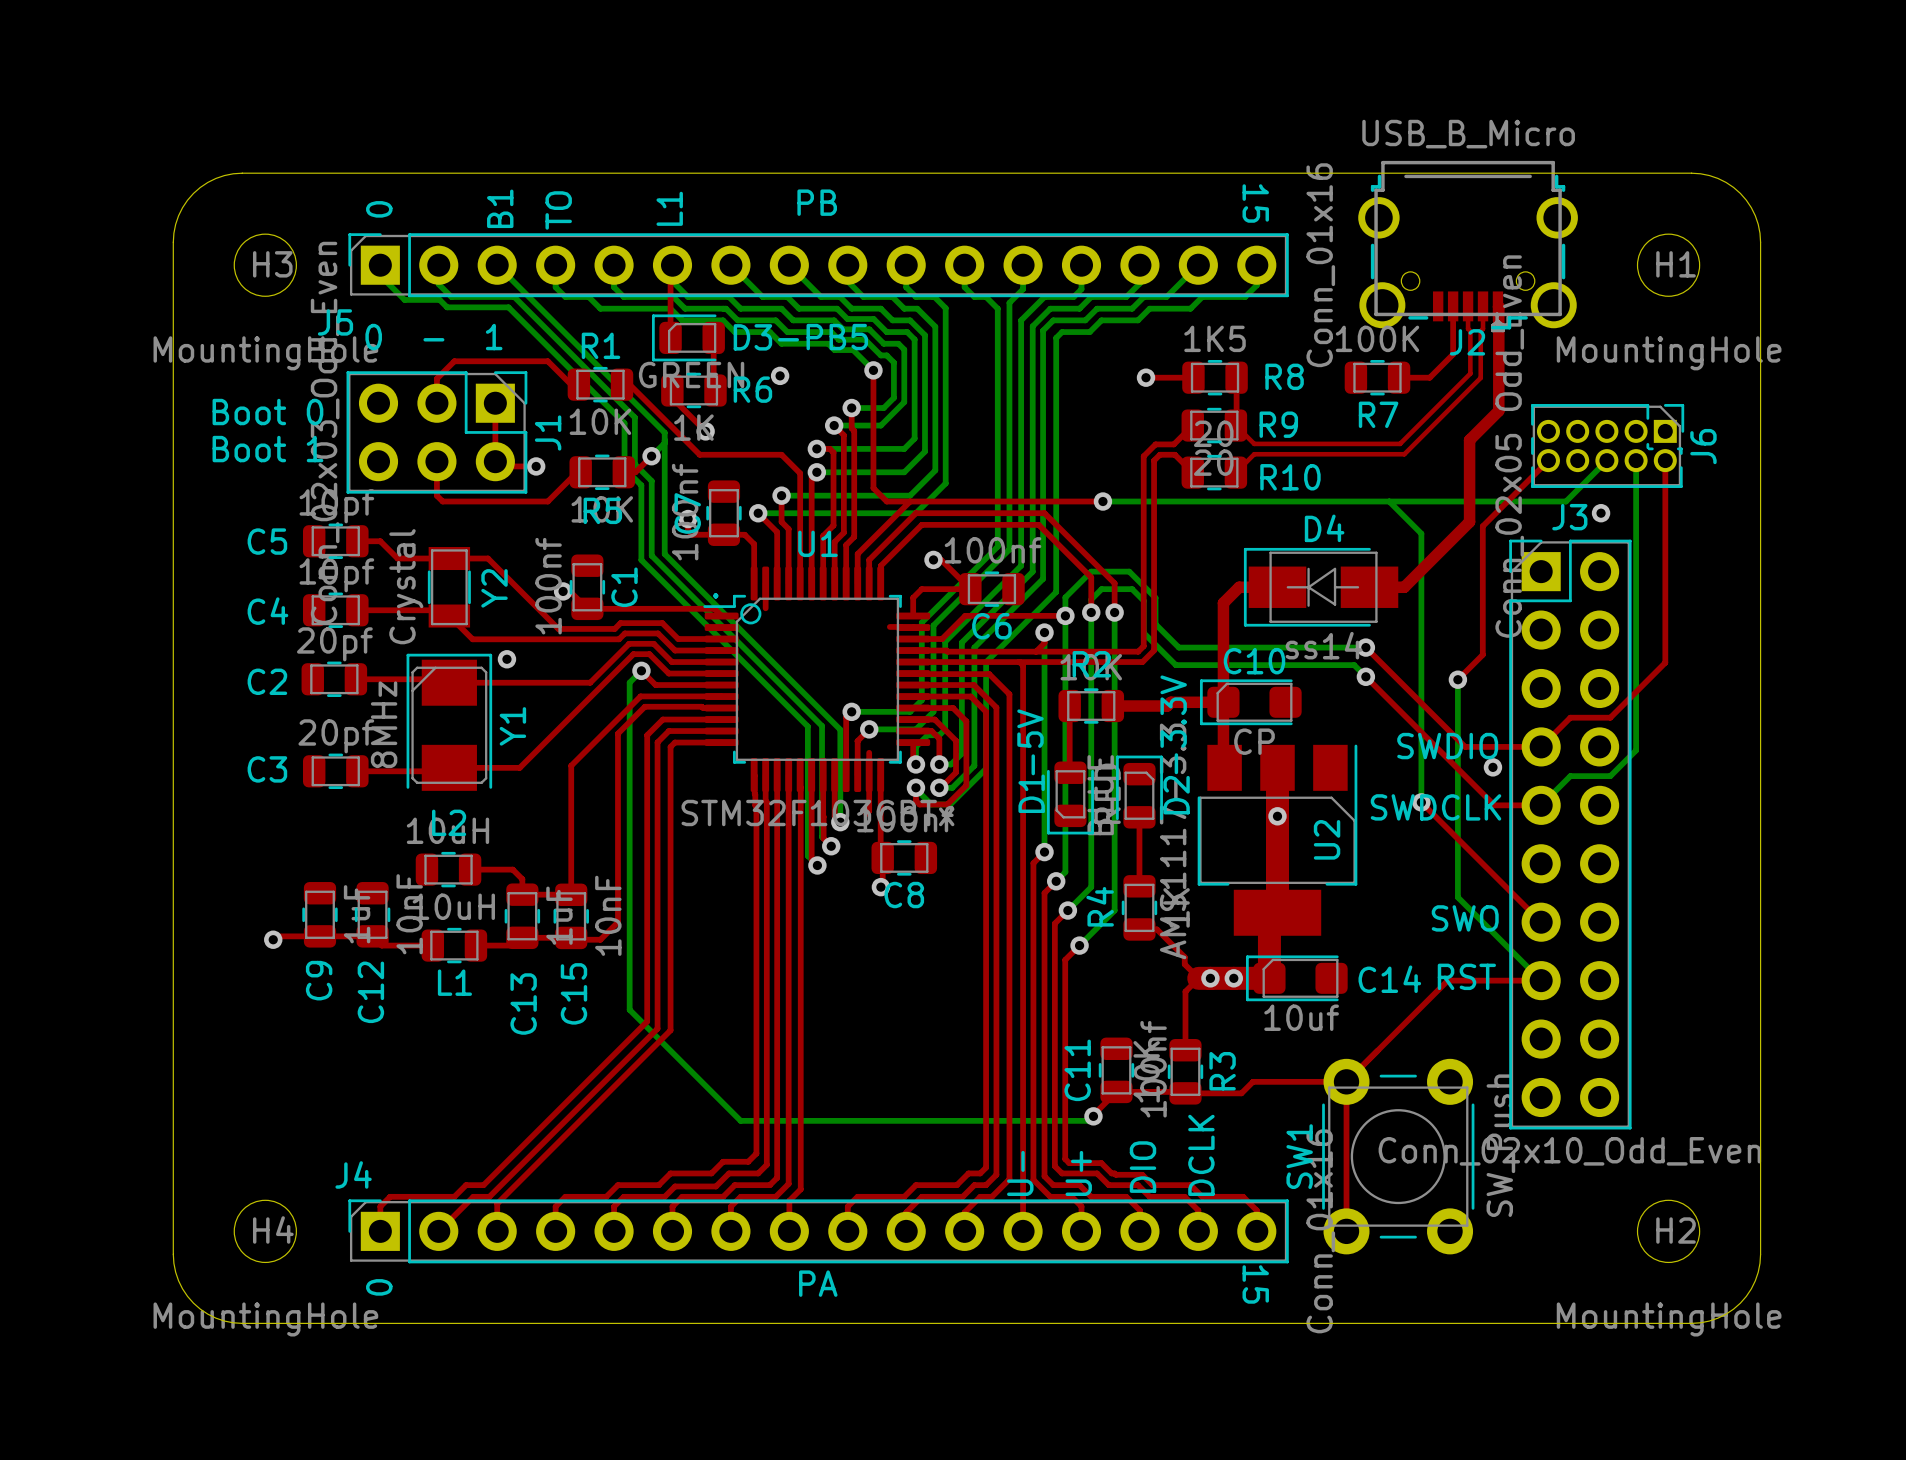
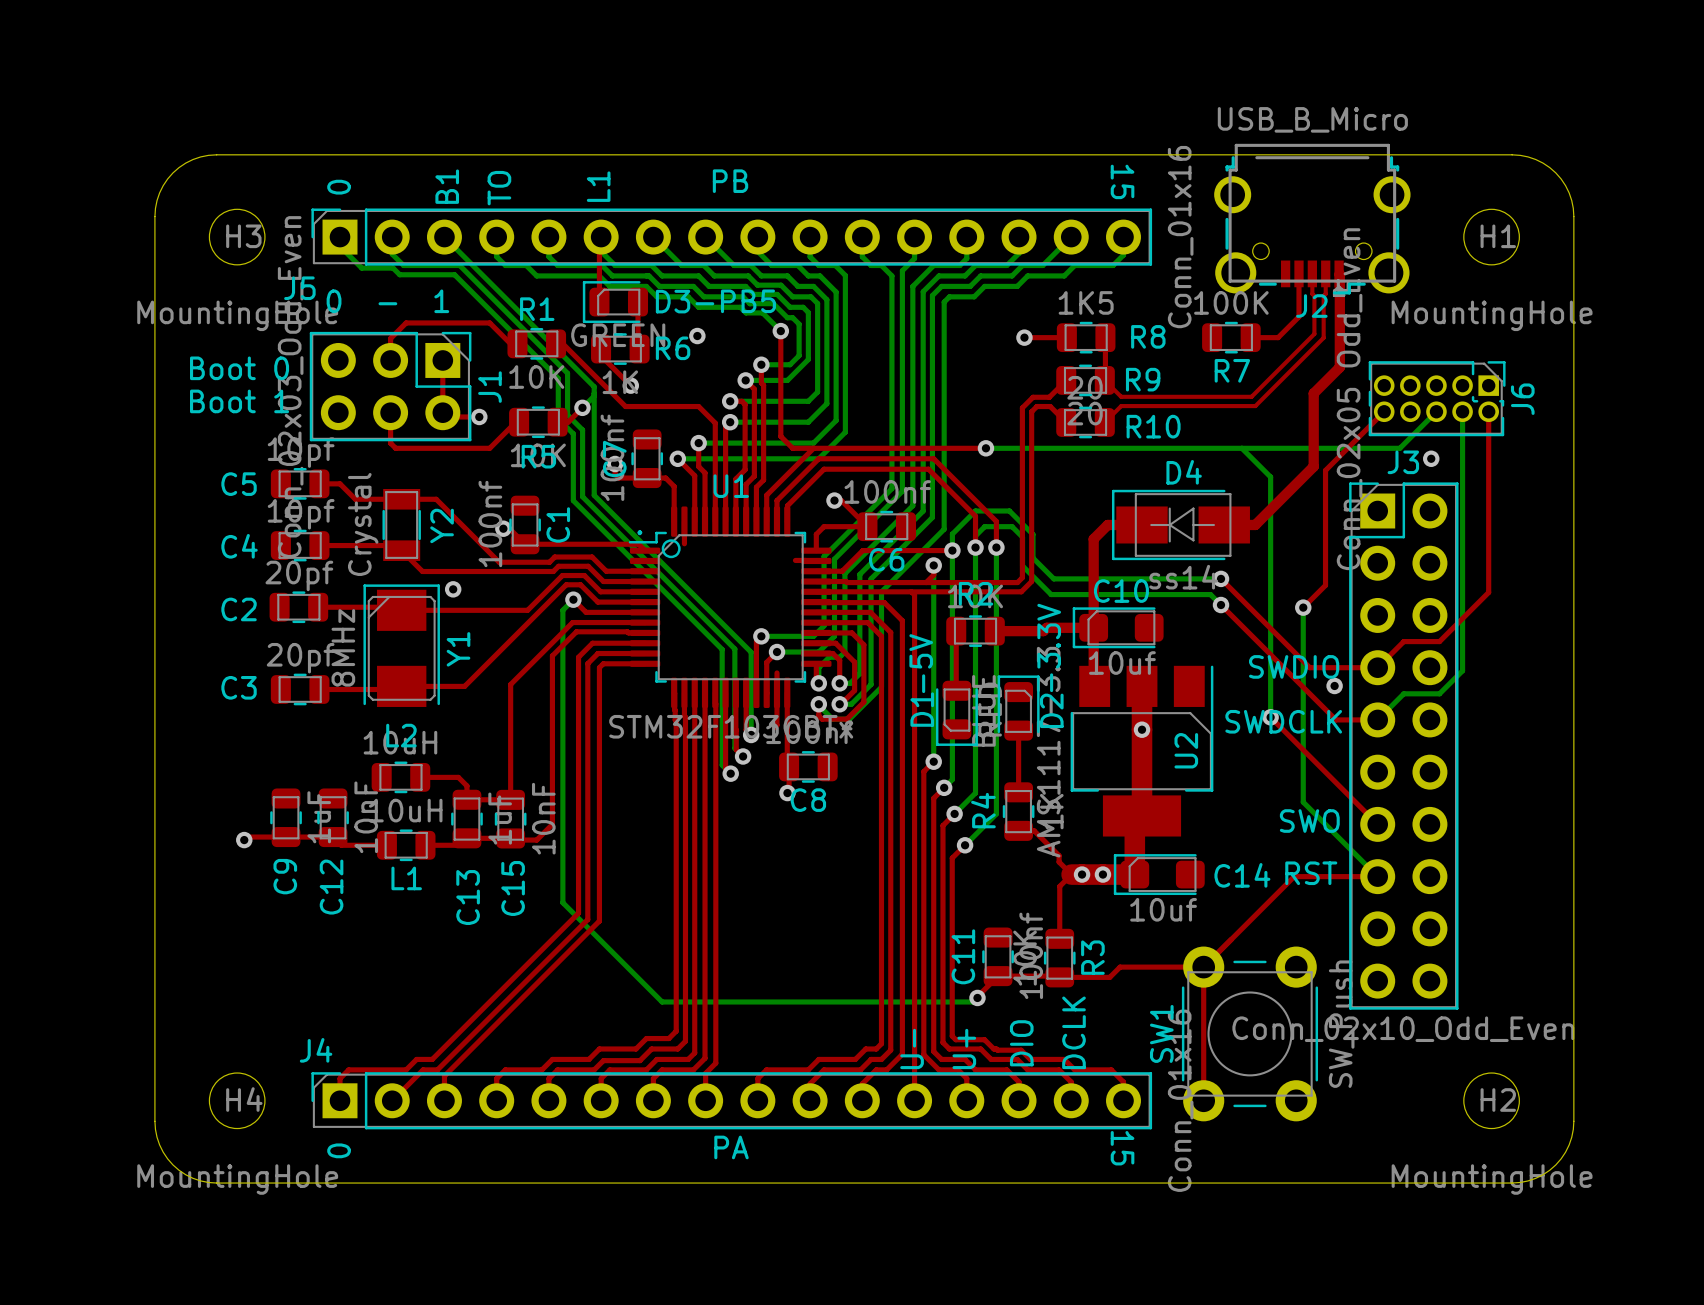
C10 value: CP (1254, 741) -> 10uf (1122, 663)

